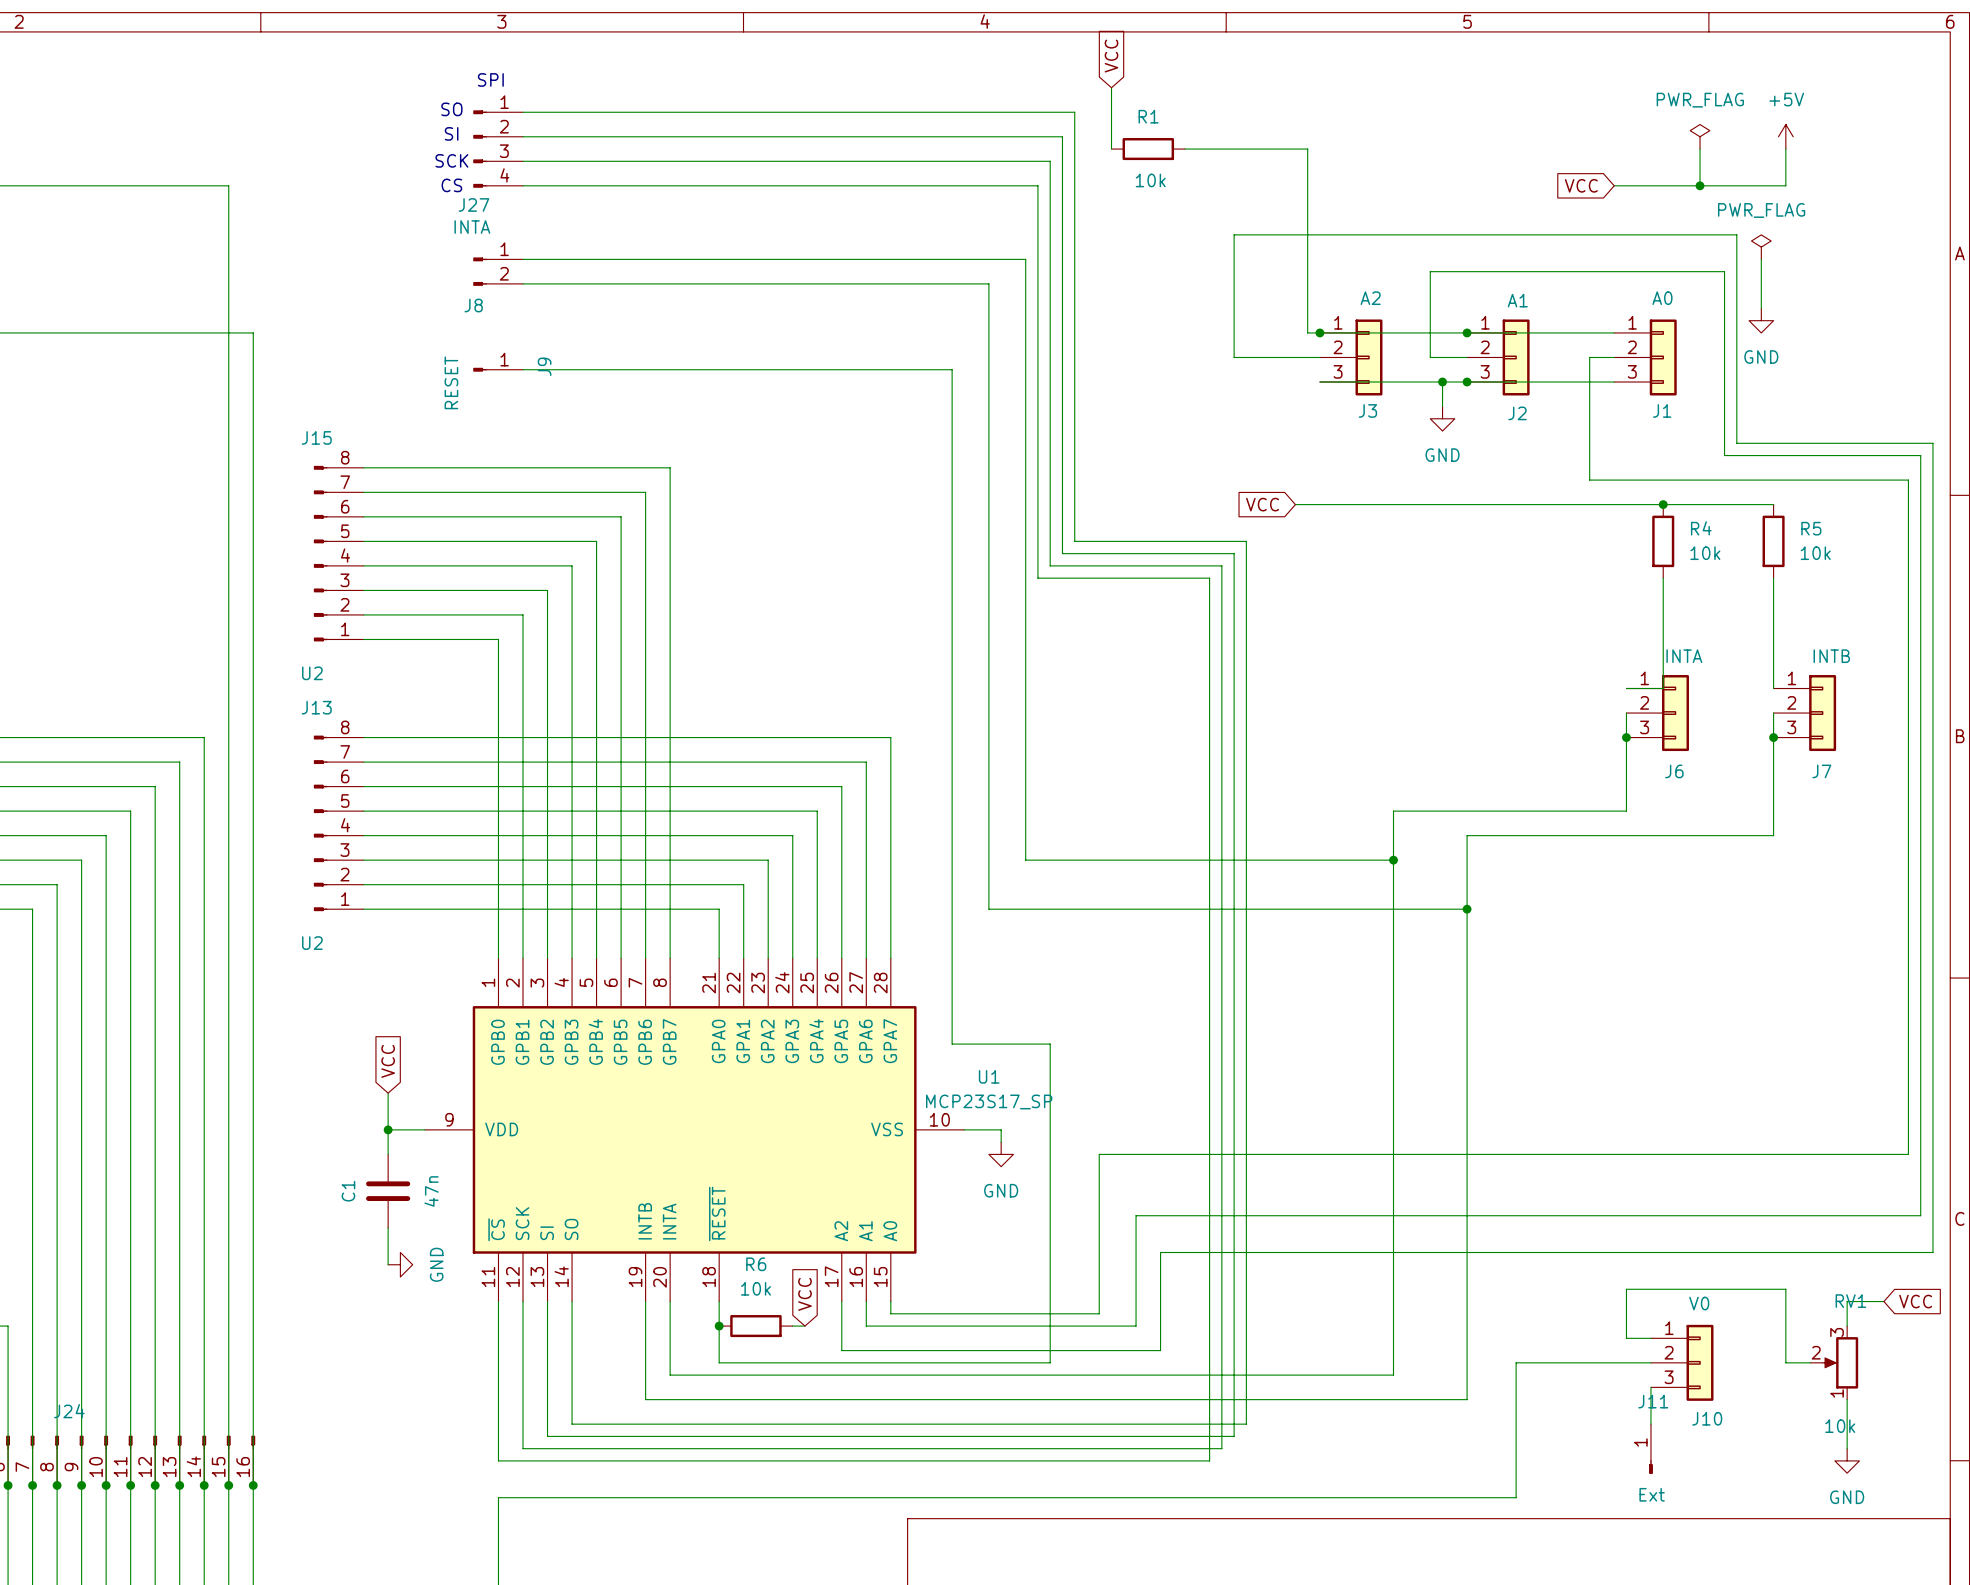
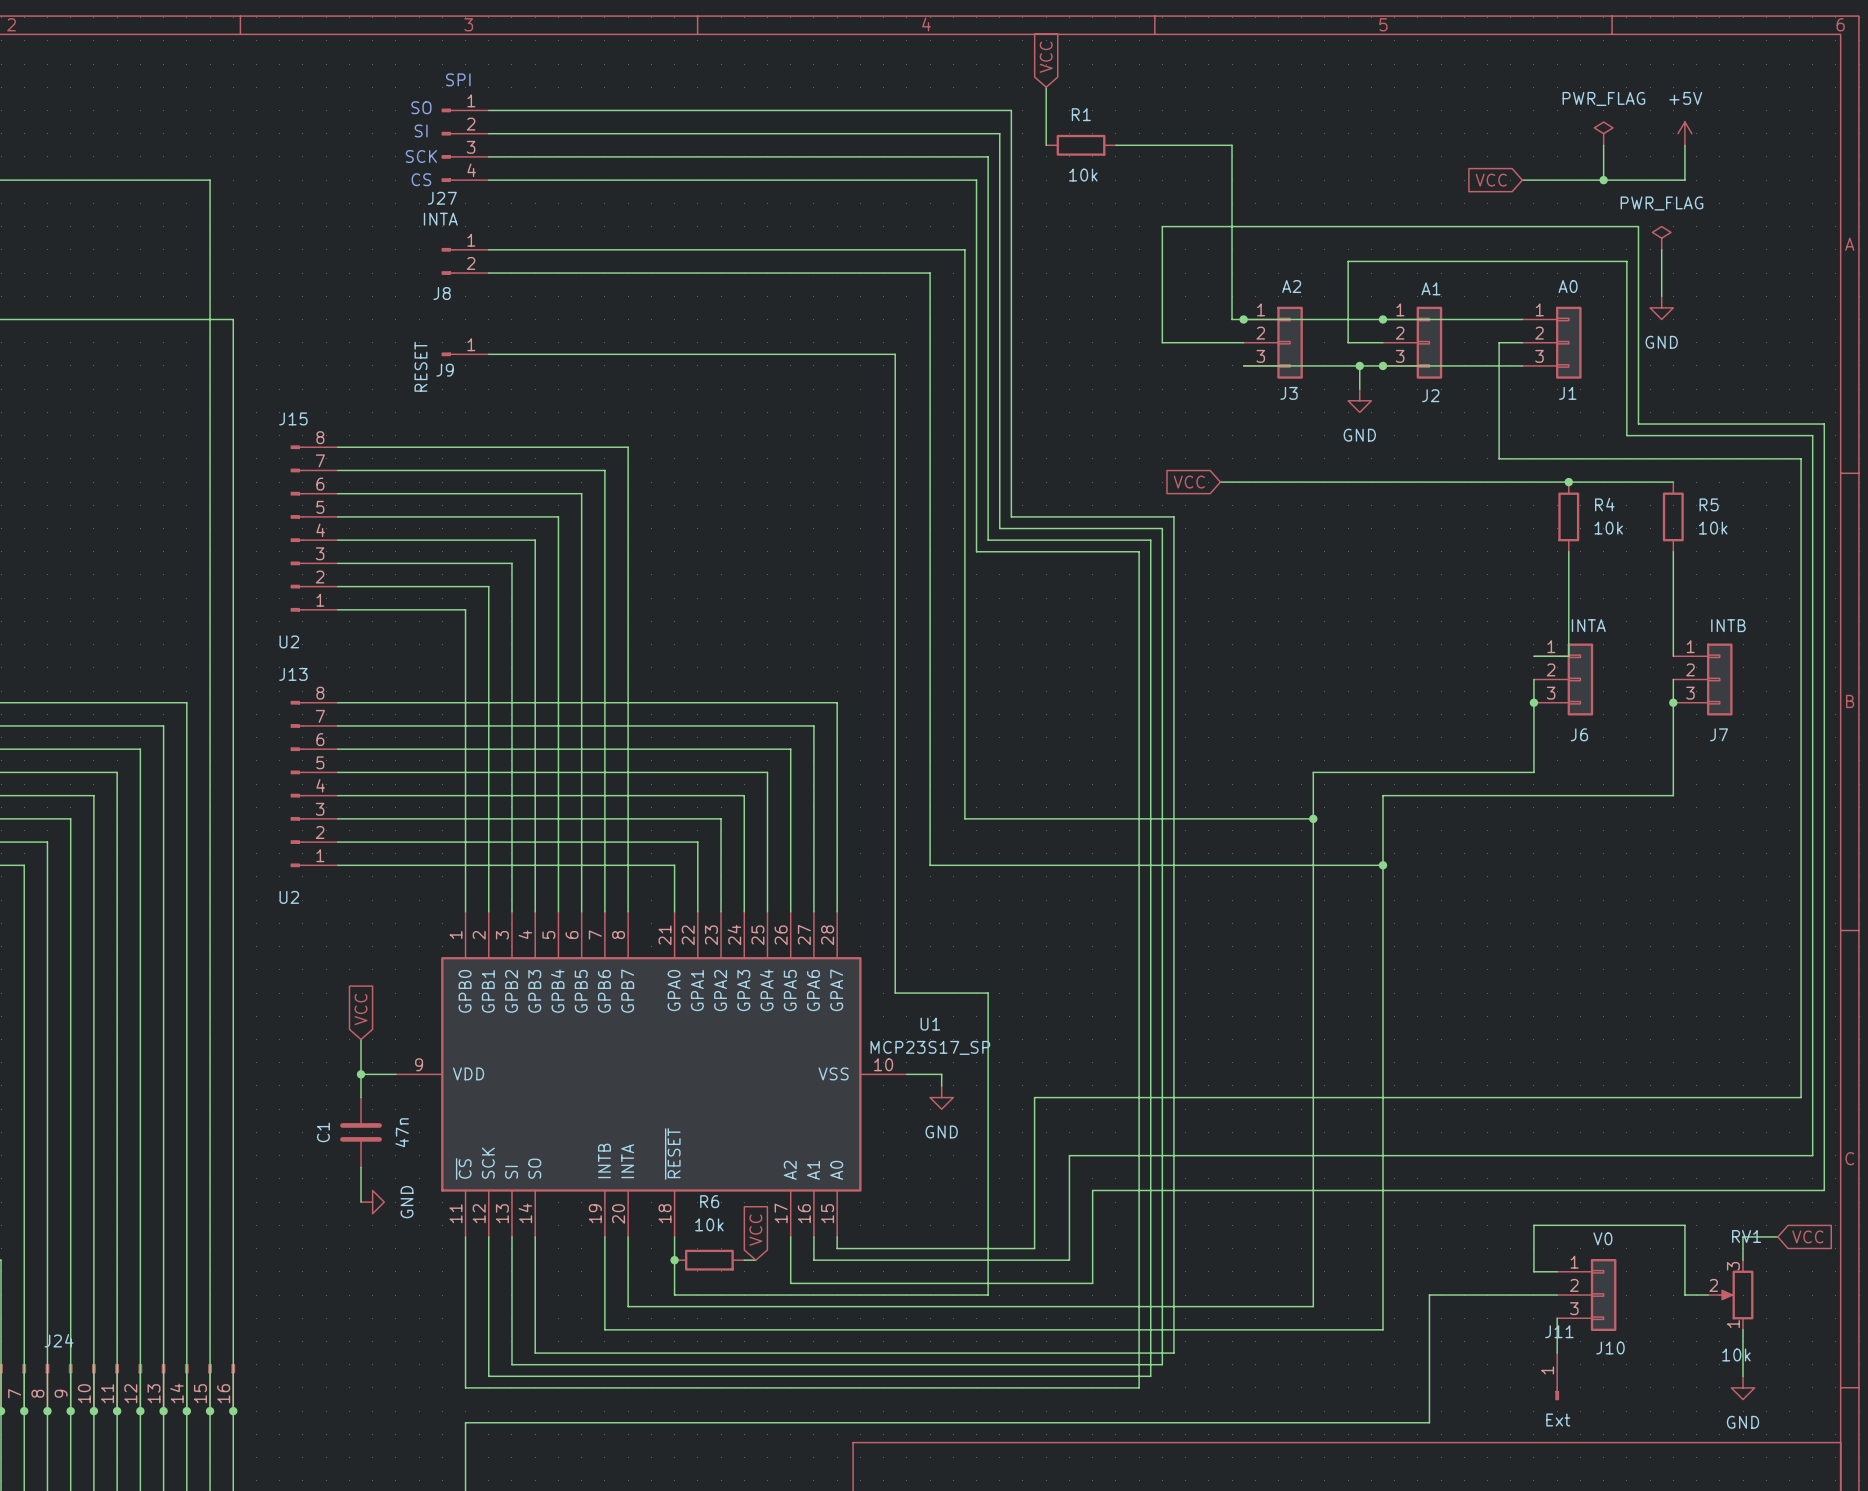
J9 name rotation: 0° (544, 366) -> 90° clockwise (445, 370)
J9 name position: J9 (544, 366) -> J9 (445, 370)

